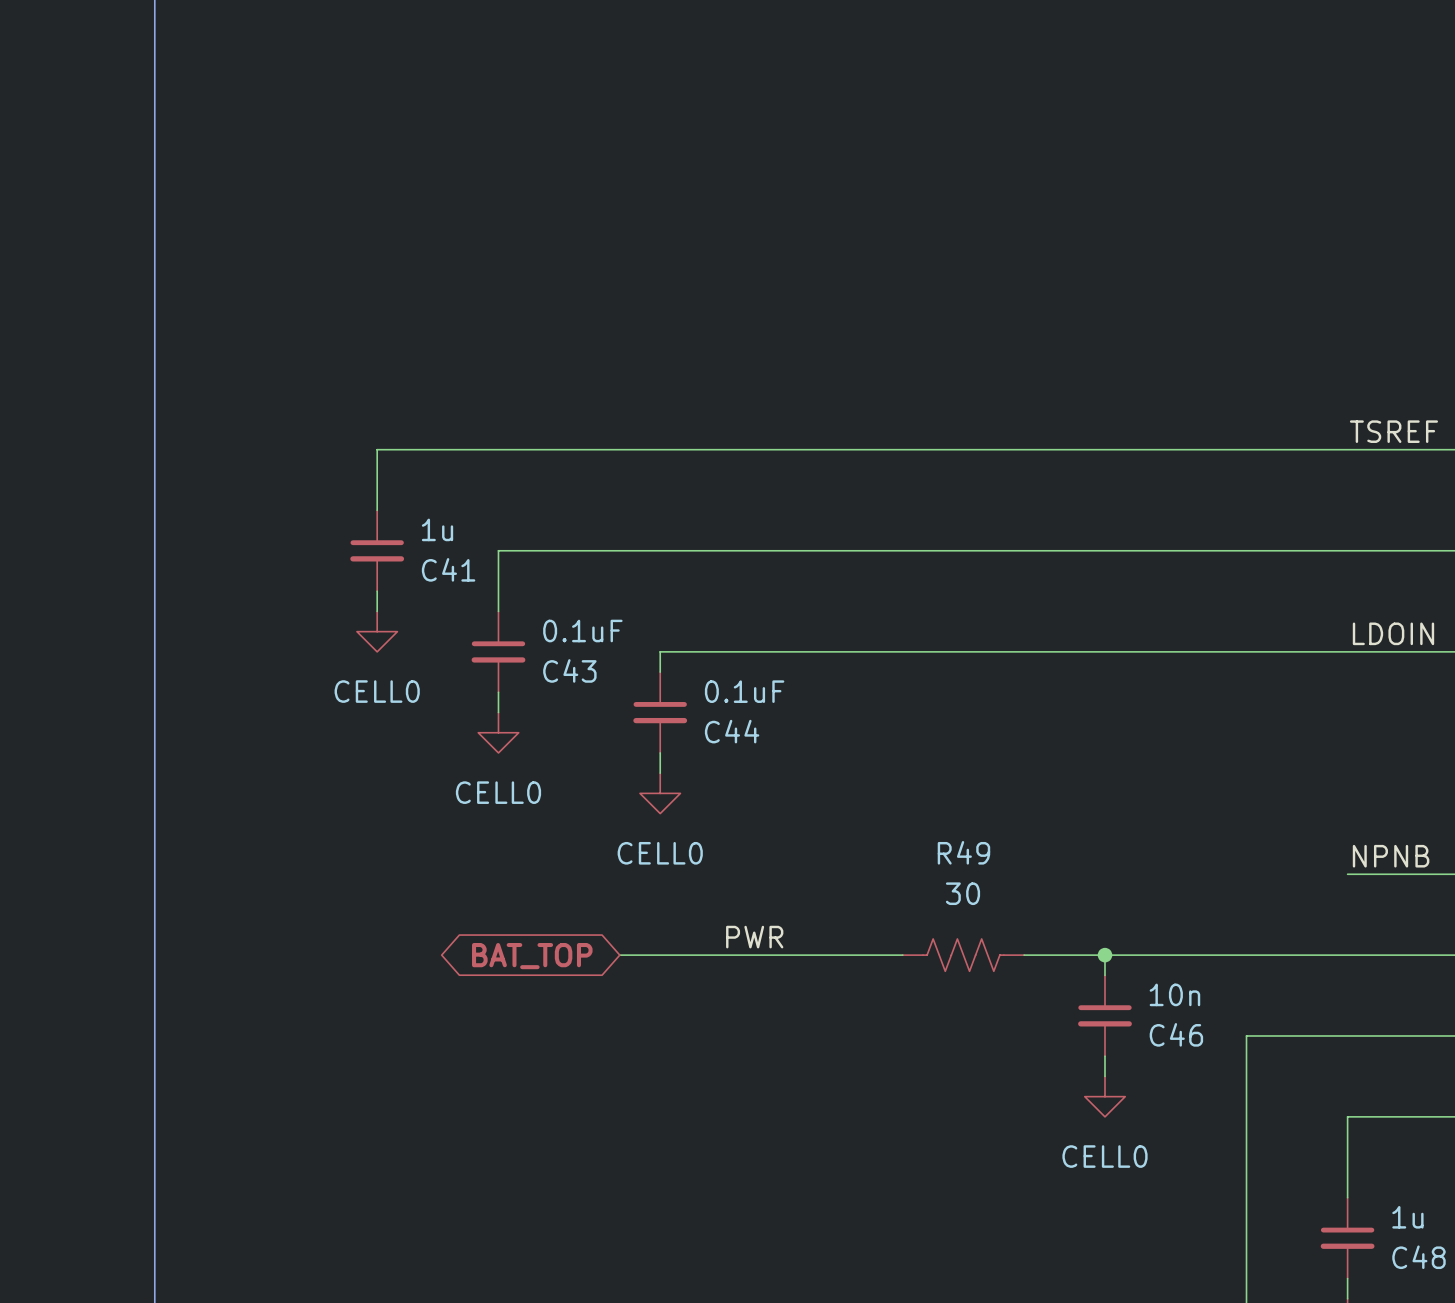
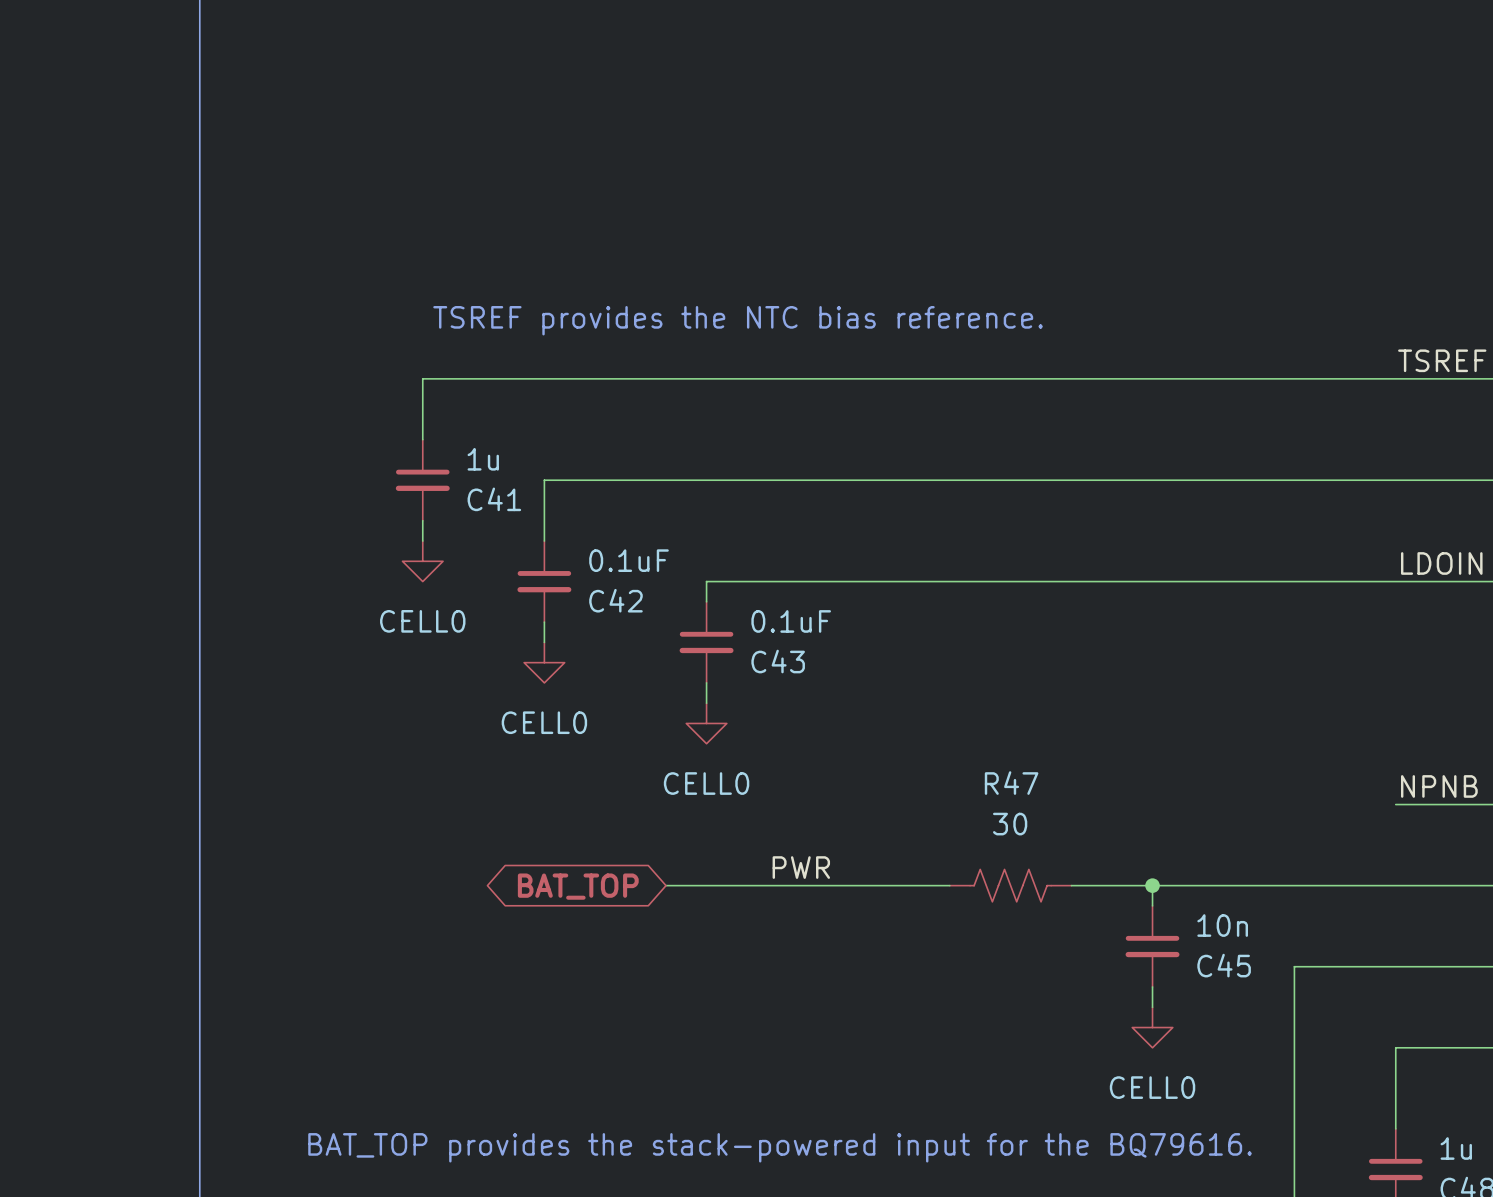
text: none -> TSREF provides the NTC bias reference. (738, 320)
C43 name: C43 (569, 670) -> C42 (615, 600)
C44 name: C44 (732, 731) -> C43 (778, 661)
R49 name: R49 (963, 852) -> R47 (1011, 783)
C46 name: C46 (1176, 1034) -> C45 (1224, 965)
text: none -> BAT_TOP provides the stack-powered input for the BQ79616. (780, 1147)

